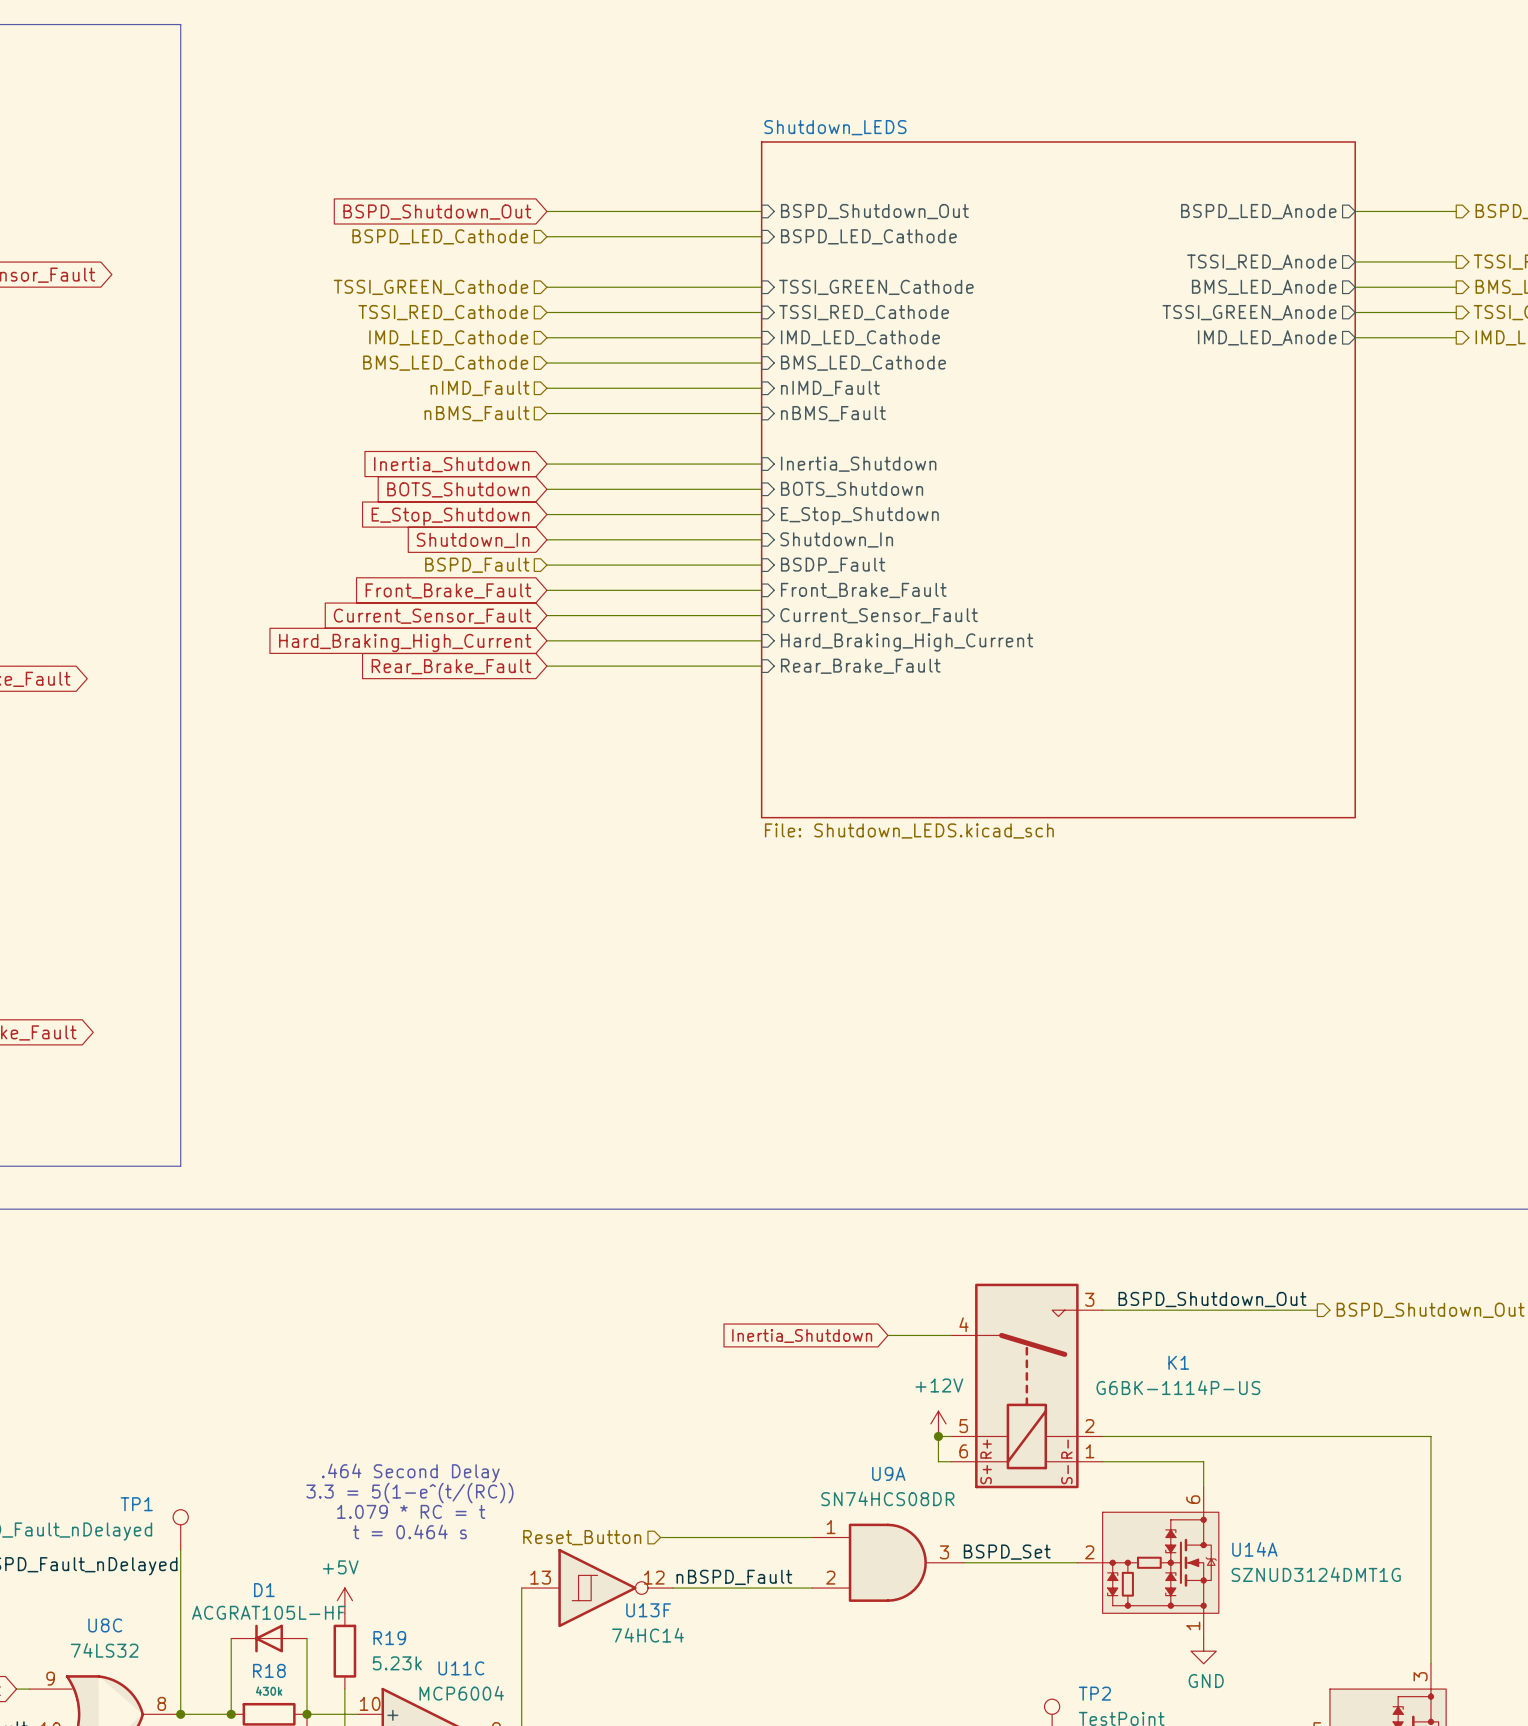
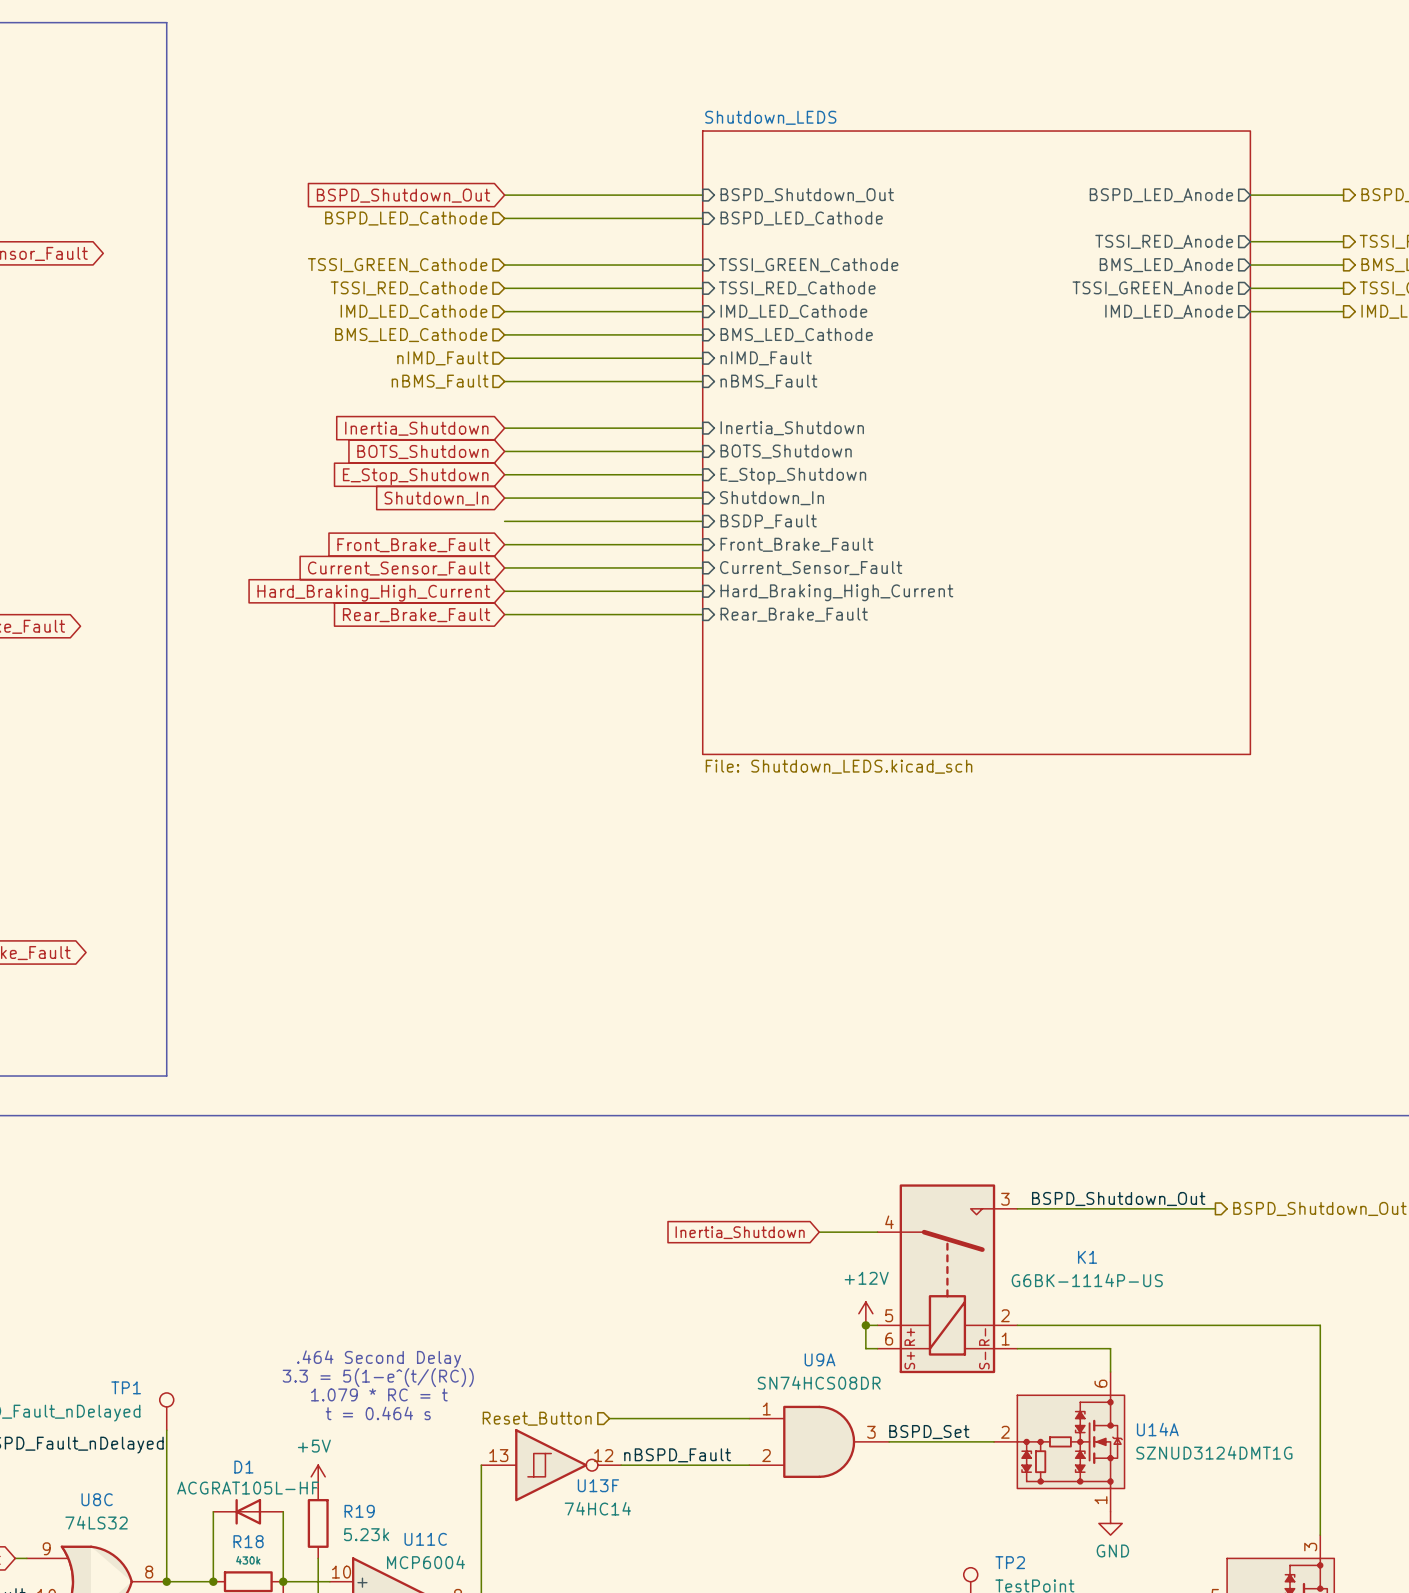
hierarchical label: BSPD_Fault (477, 565) -> none

